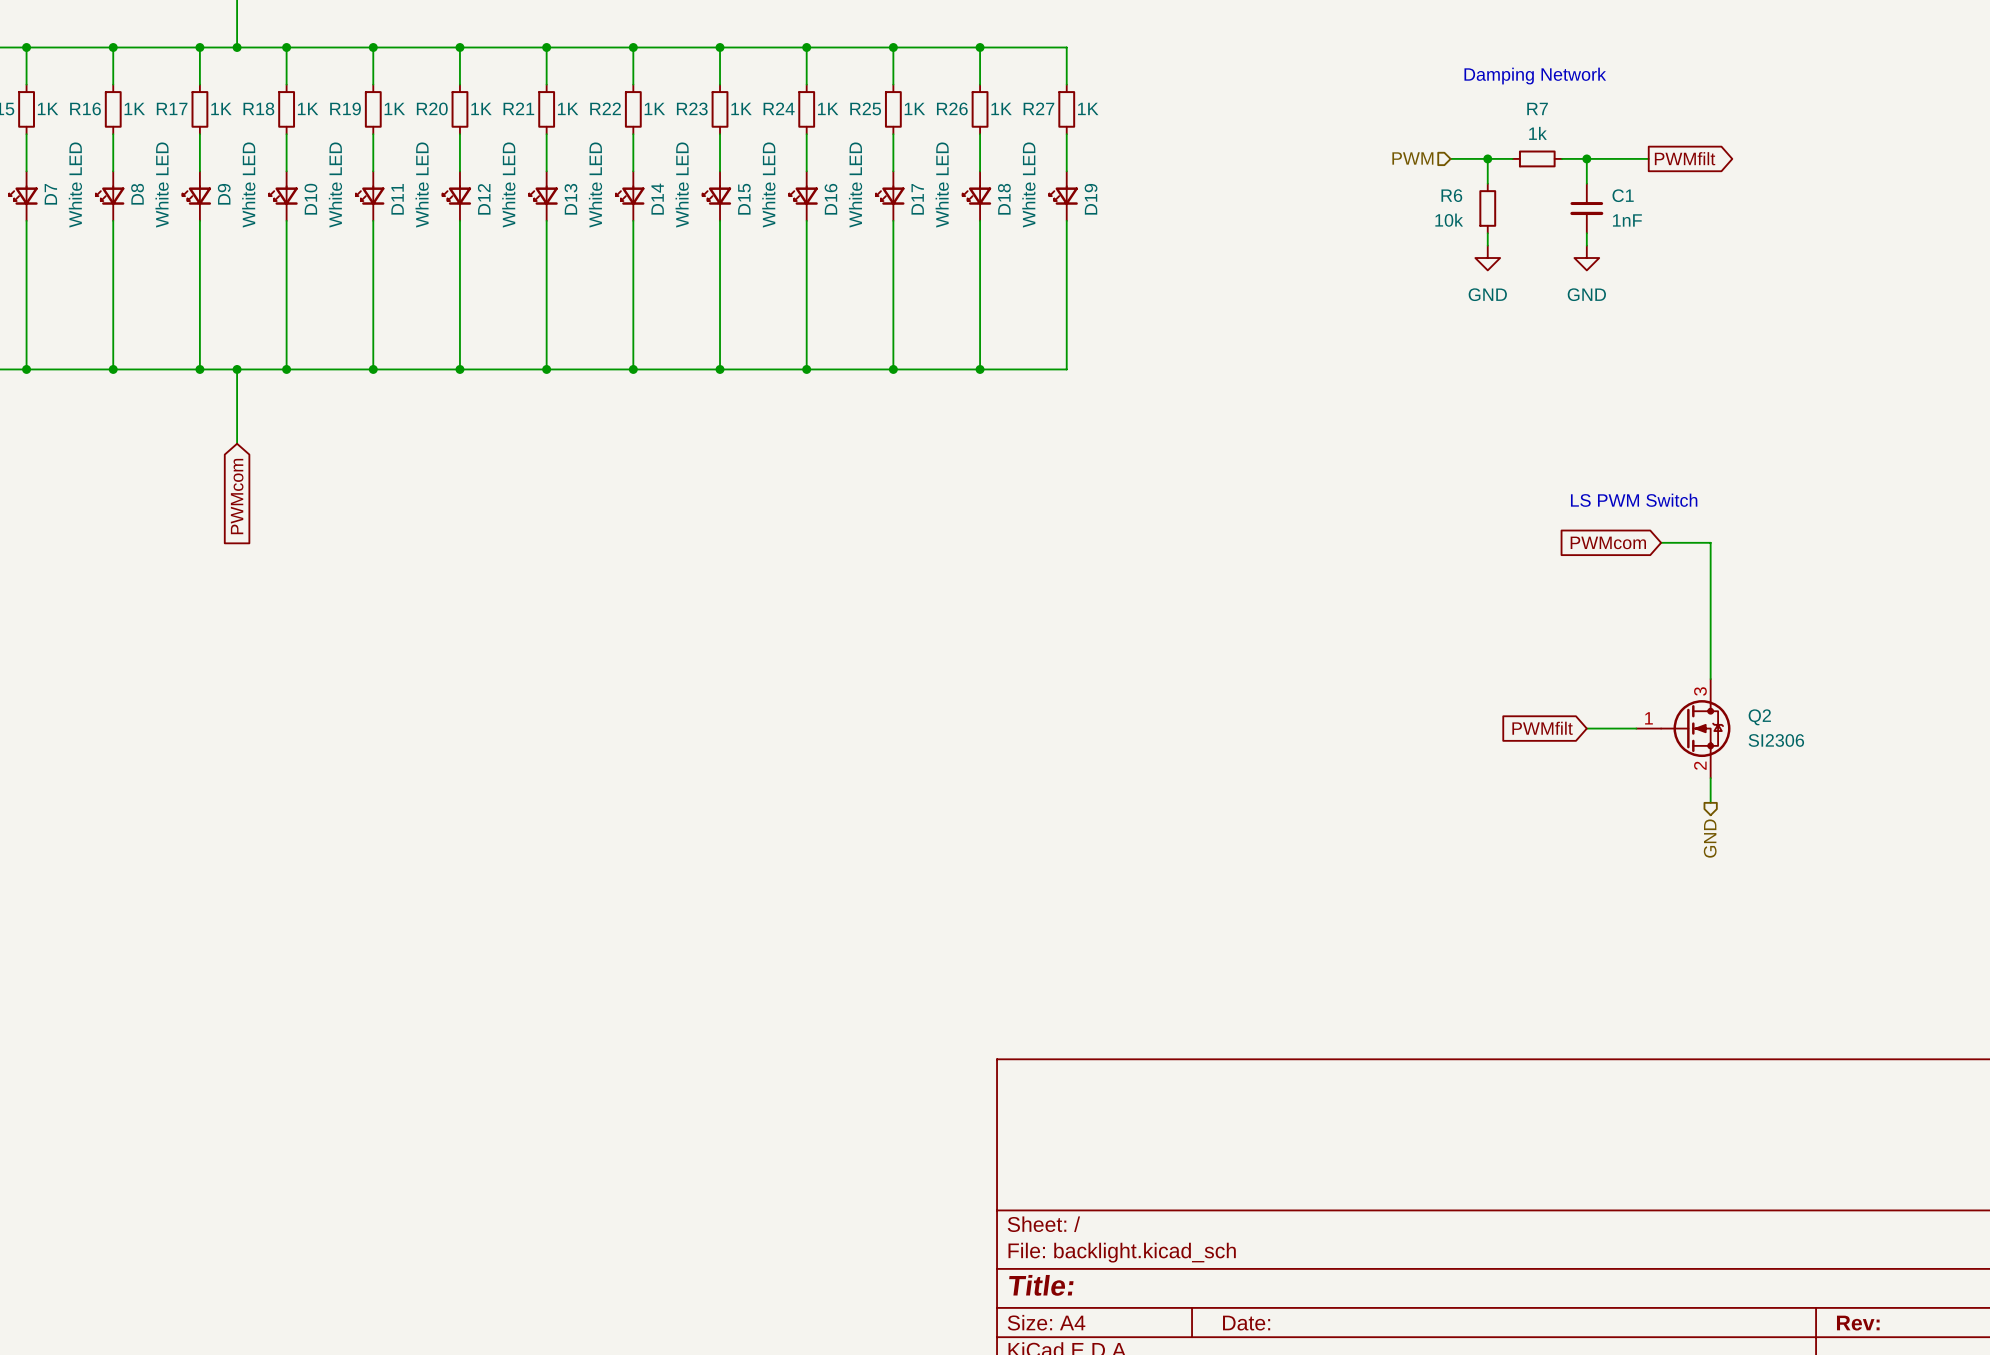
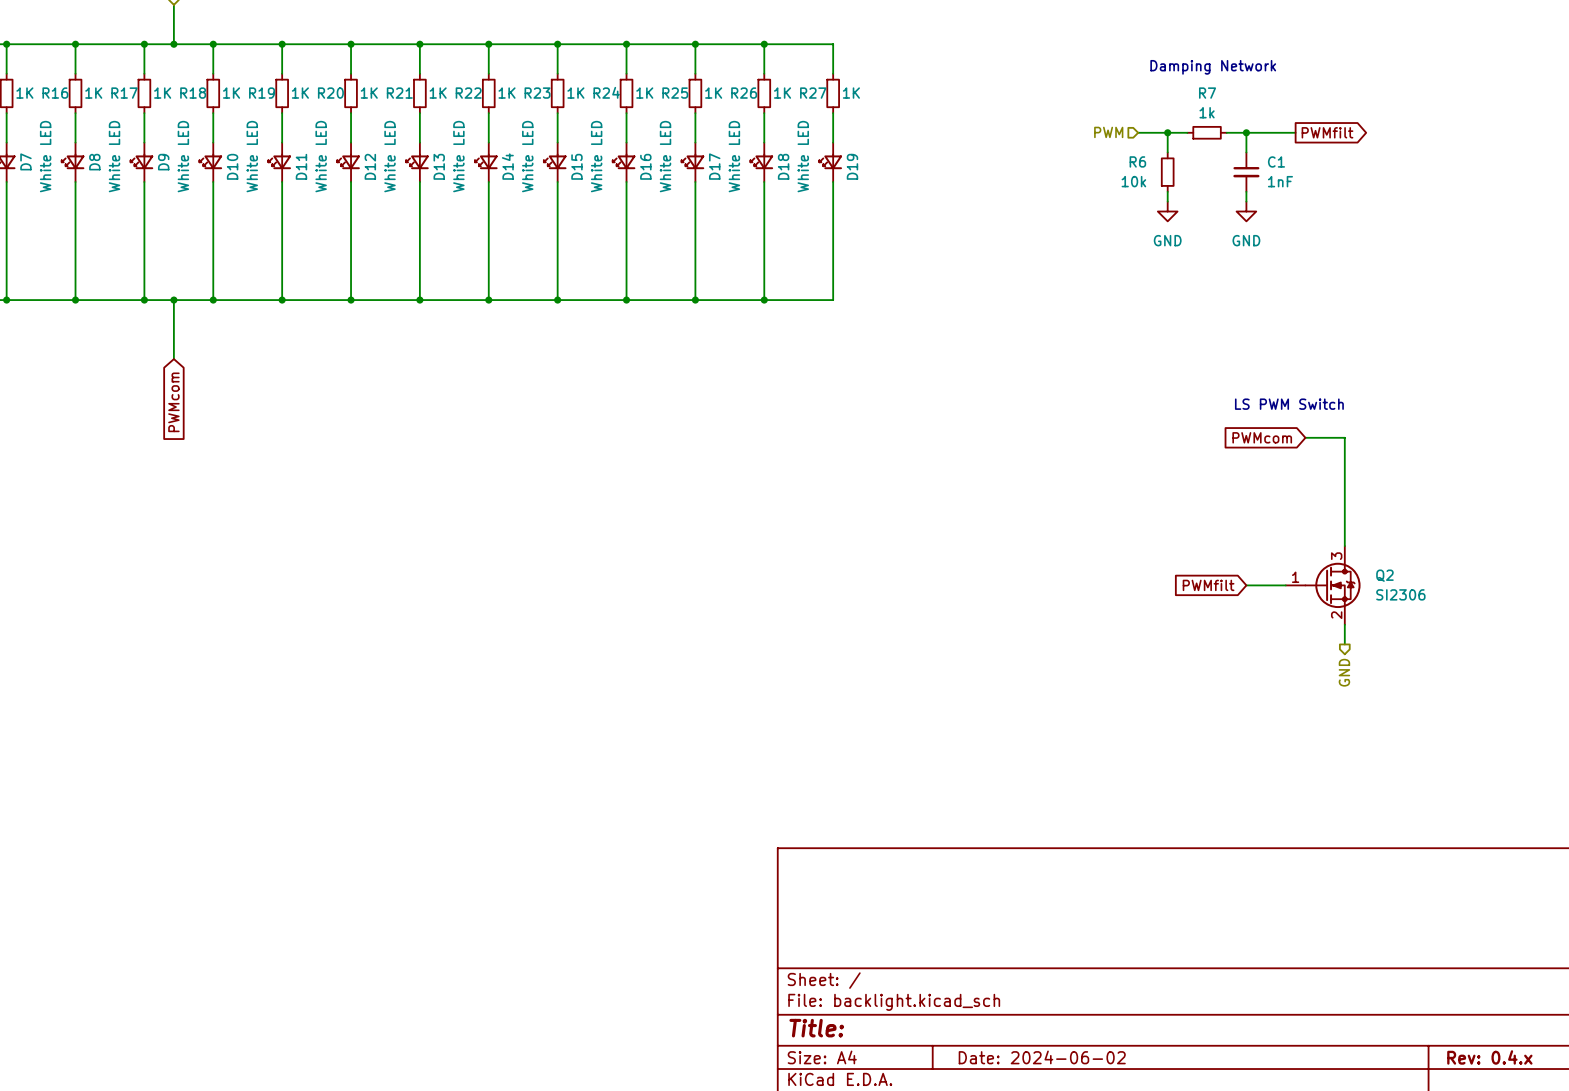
title block: Date: (1246, 1323) -> Date: 2024-06-02 (1042, 1057)
title block: Rev: (1858, 1323) -> Rev: 0.4.x (1489, 1057)

